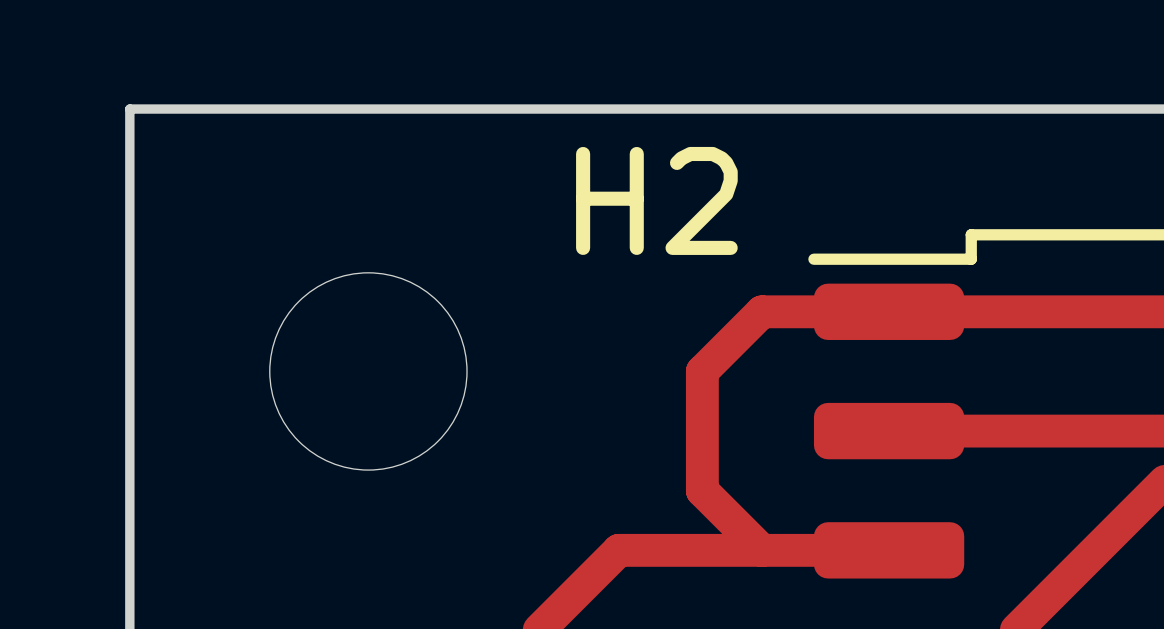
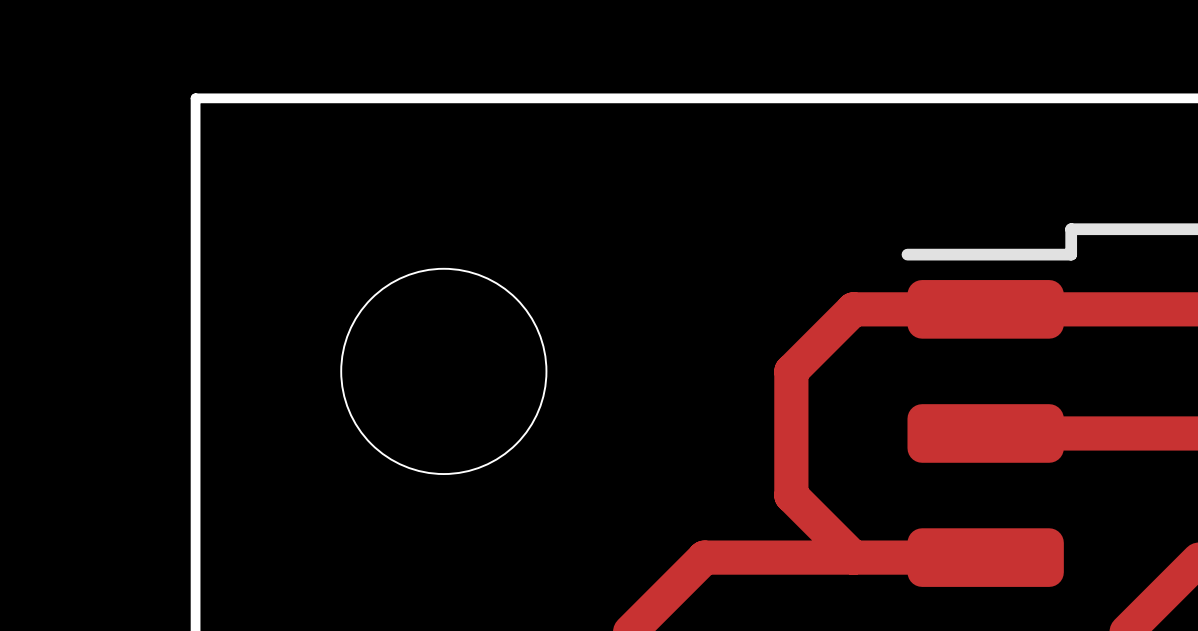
H2 name: H2 (656, 200) -> none

